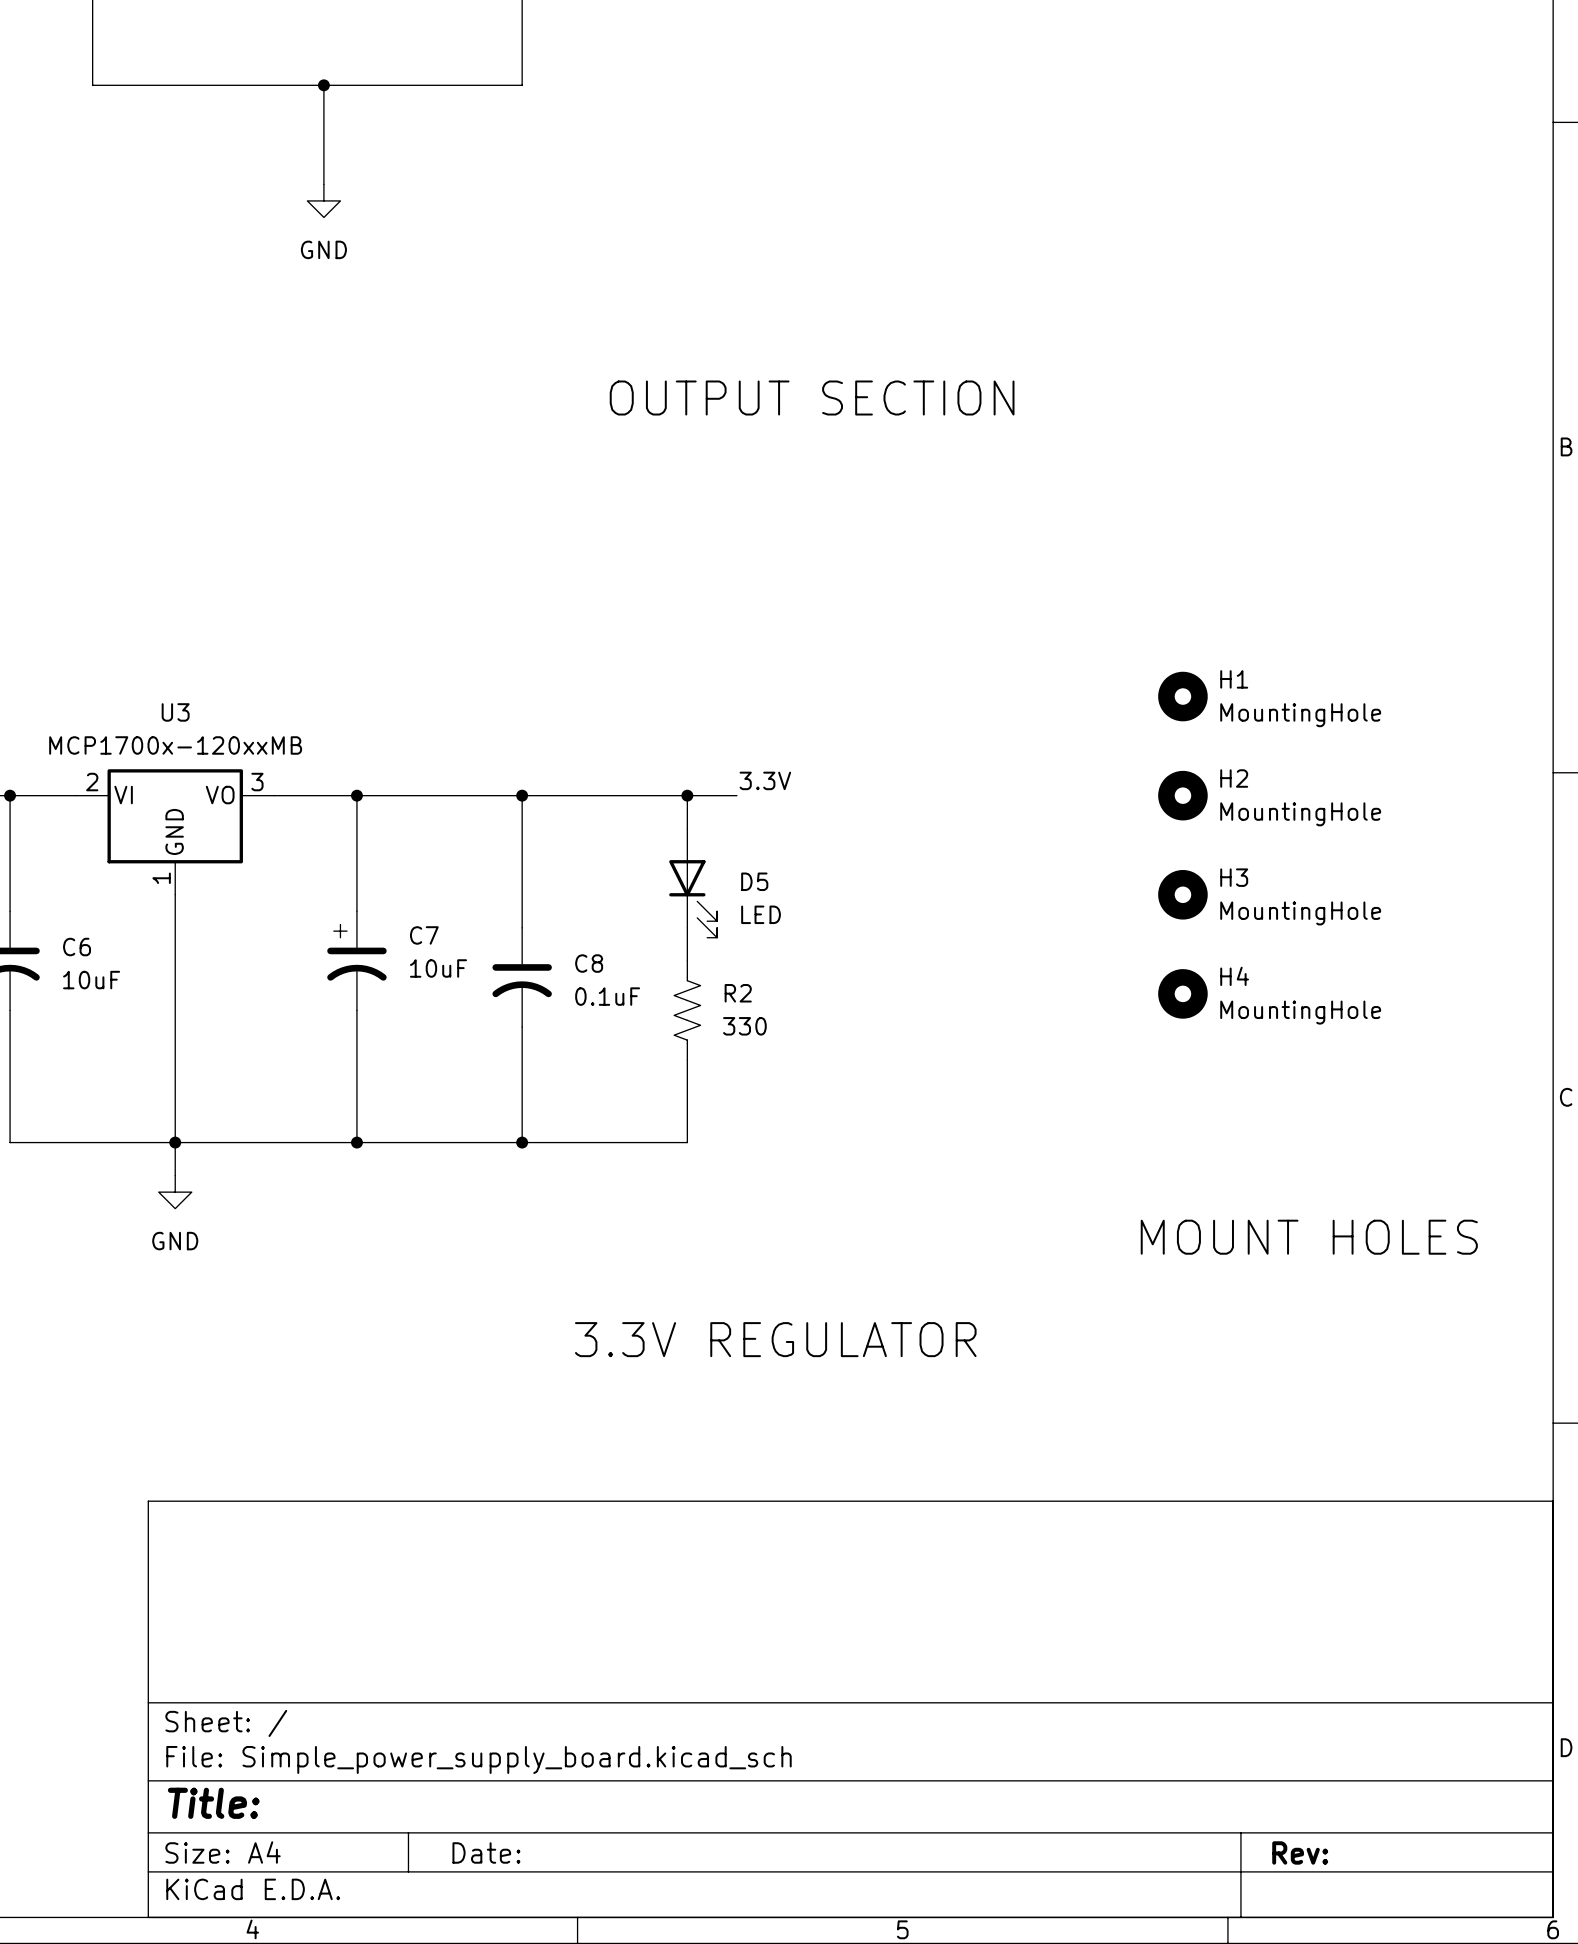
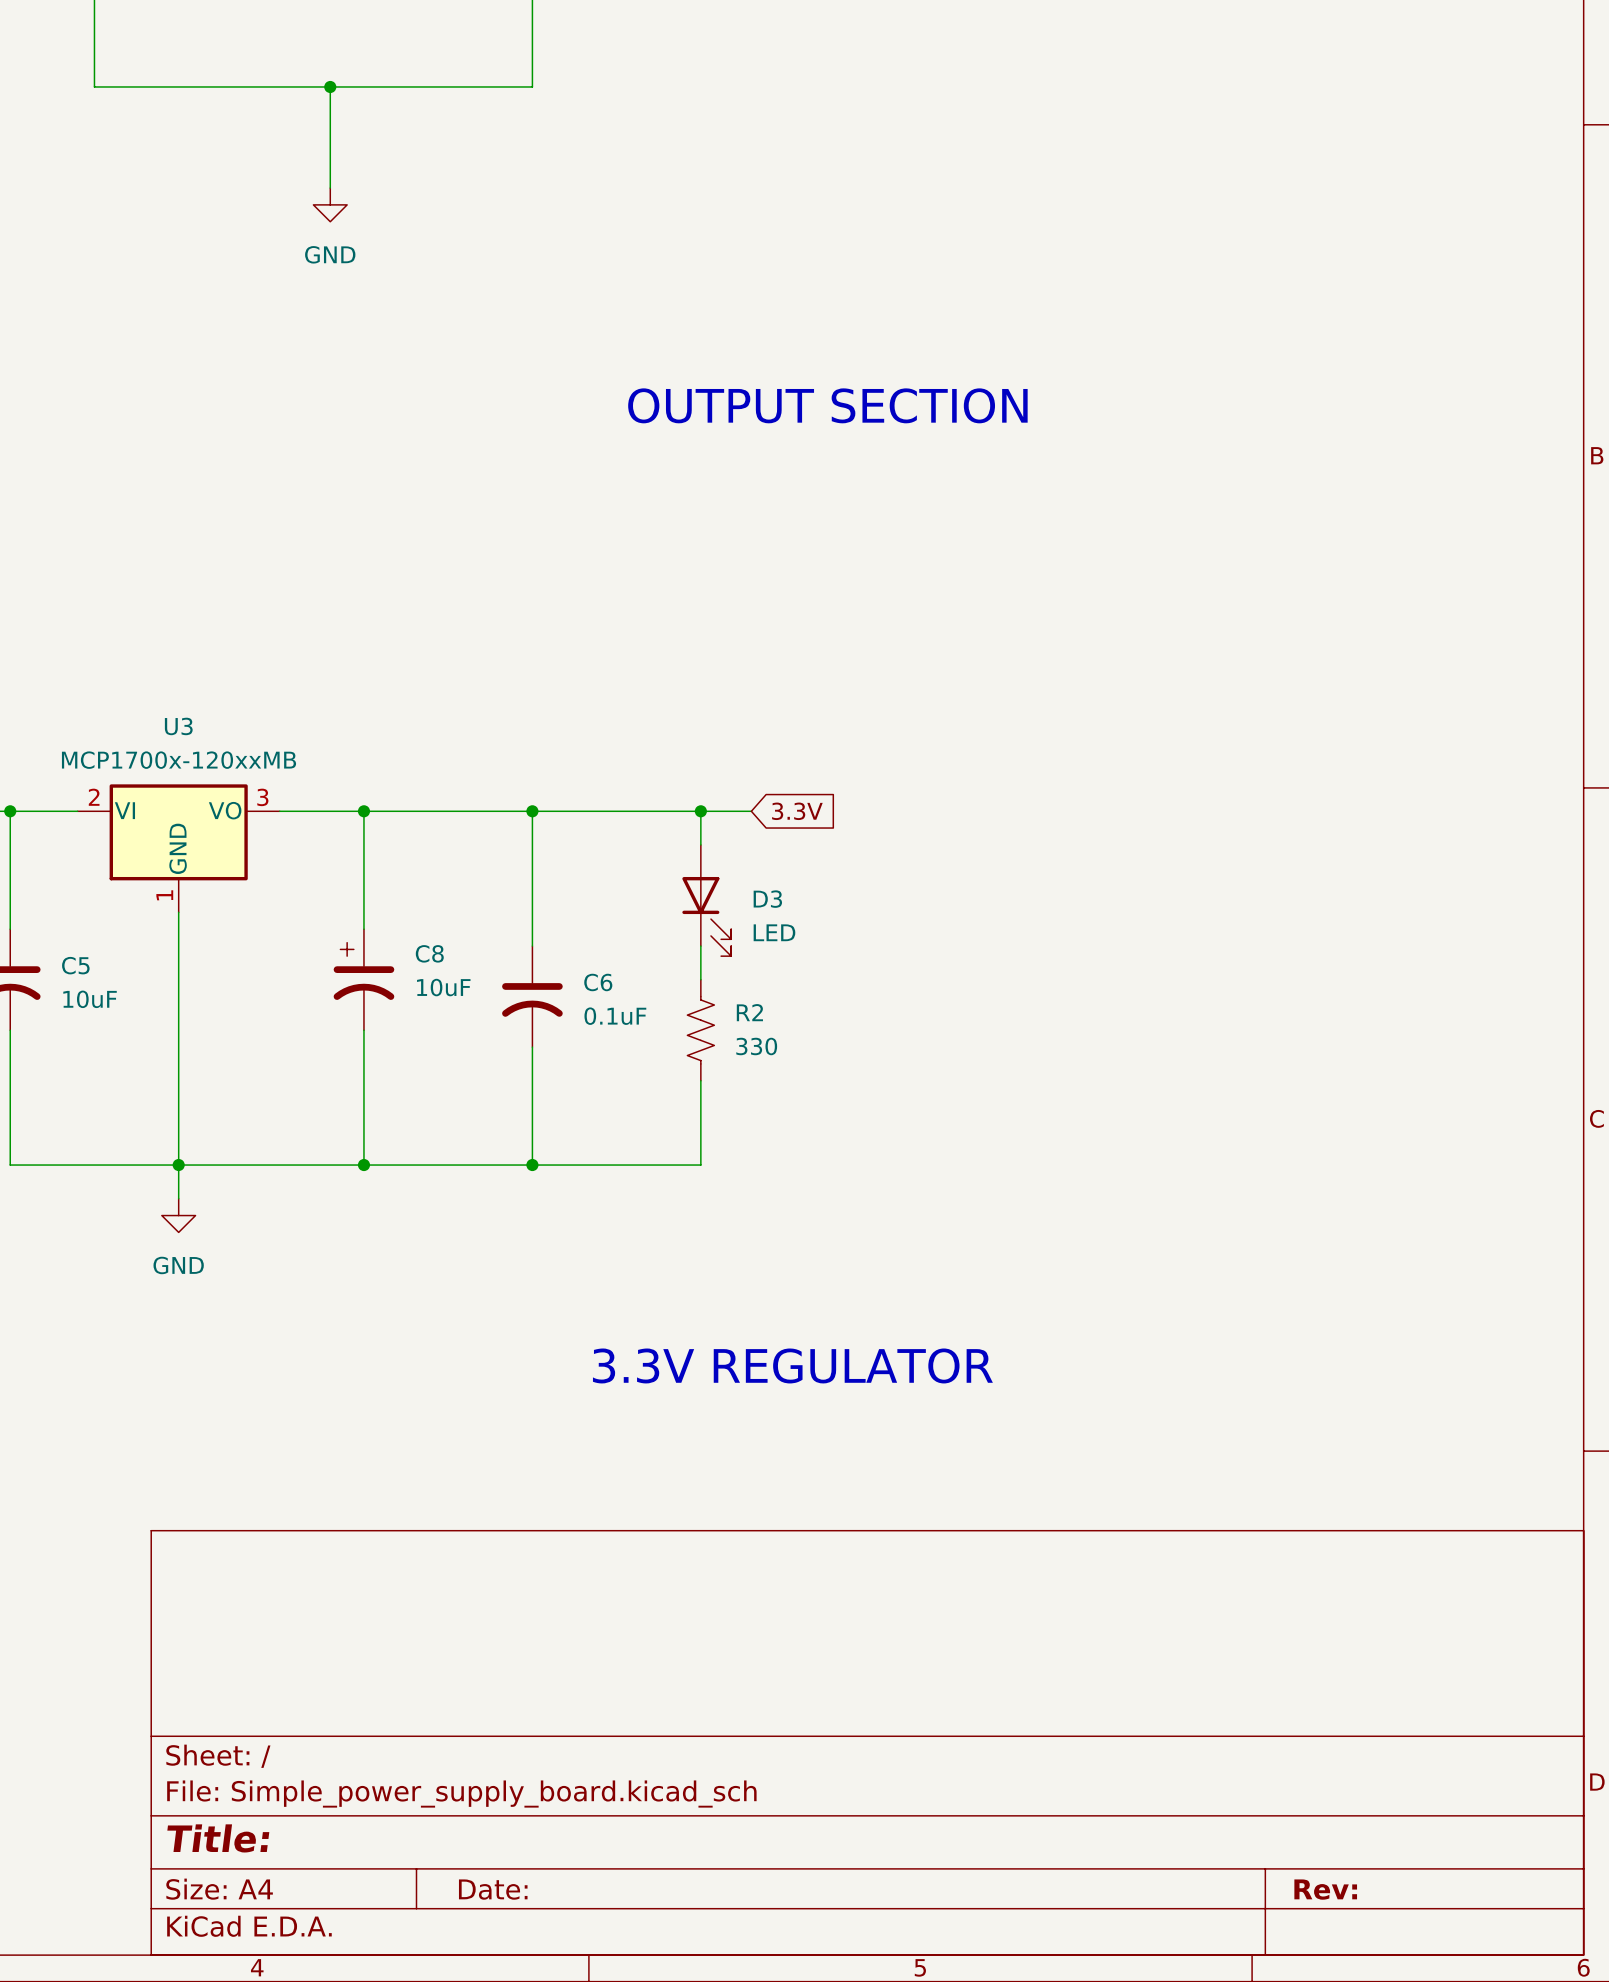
H1: MountingHole (1182, 696) -> none
label: 3.3V (765, 780) -> none
global label: none -> 3.3V (797, 811)
H2: MountingHole (1182, 795) -> none
D5 name: D5 (754, 881) -> D3 (767, 899)
H3: MountingHole (1182, 894) -> none
C7 name: C7 (424, 935) -> C8 (429, 953)
C6 name: C6 (77, 947) -> C5 (75, 965)
C8 name: C8 (589, 963) -> C6 (598, 982)
H4: MountingHole (1182, 993) -> none
text: MOUNT HOLES (1309, 1237) -> none

